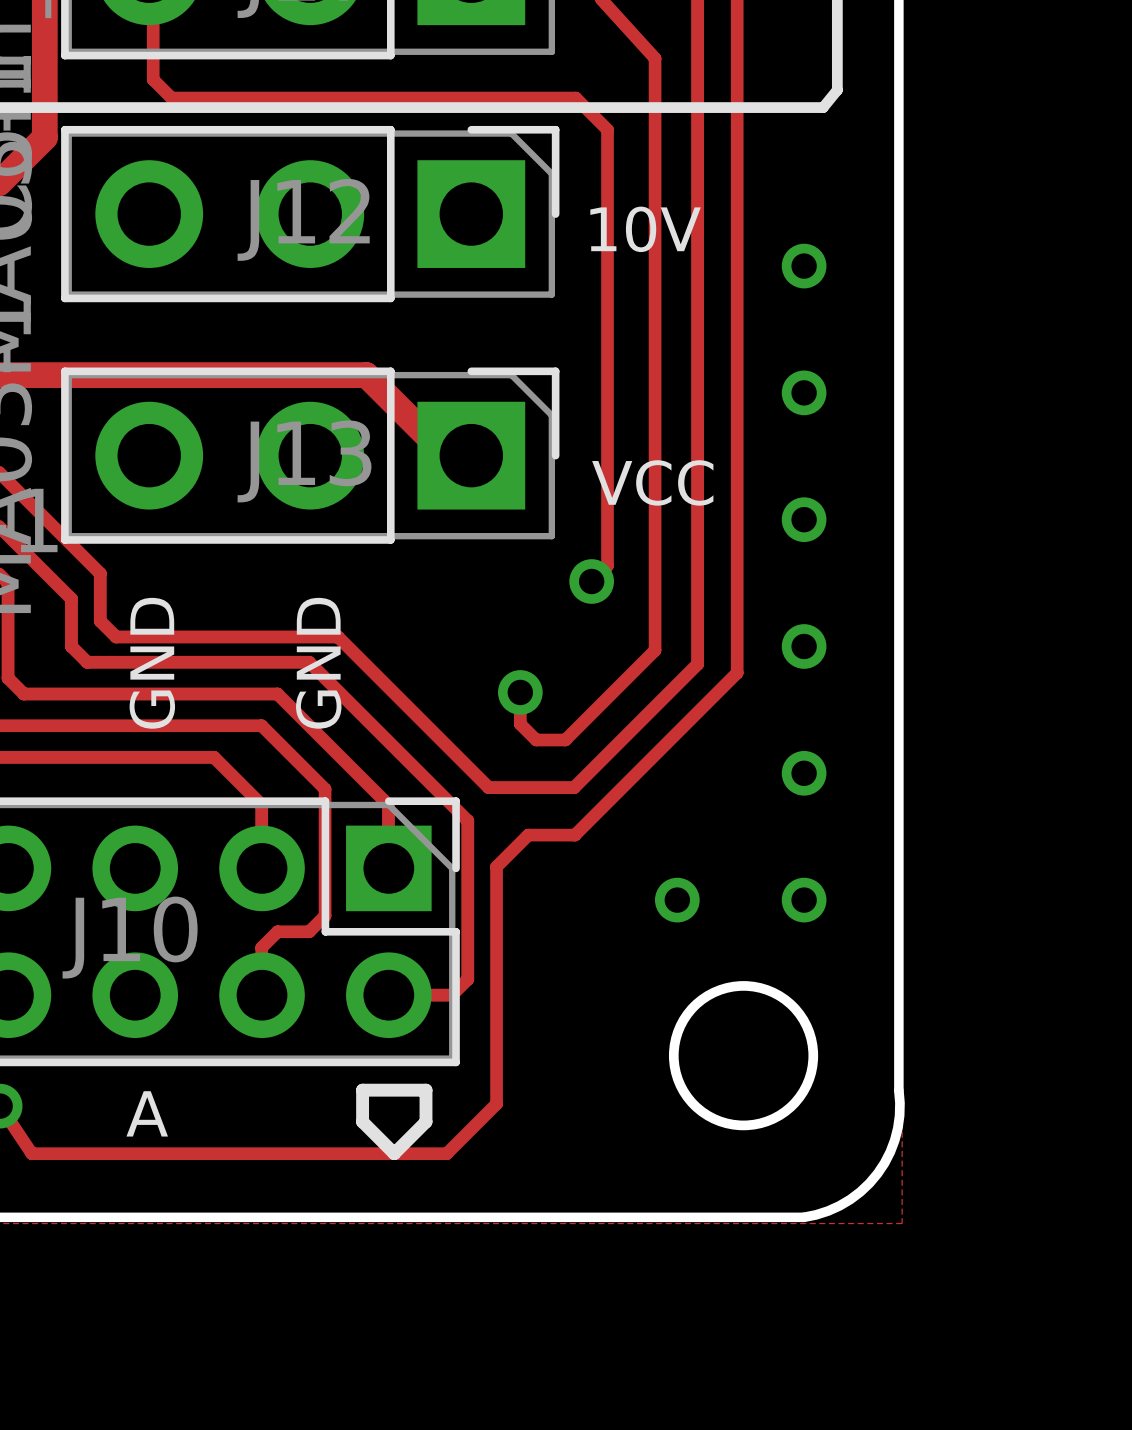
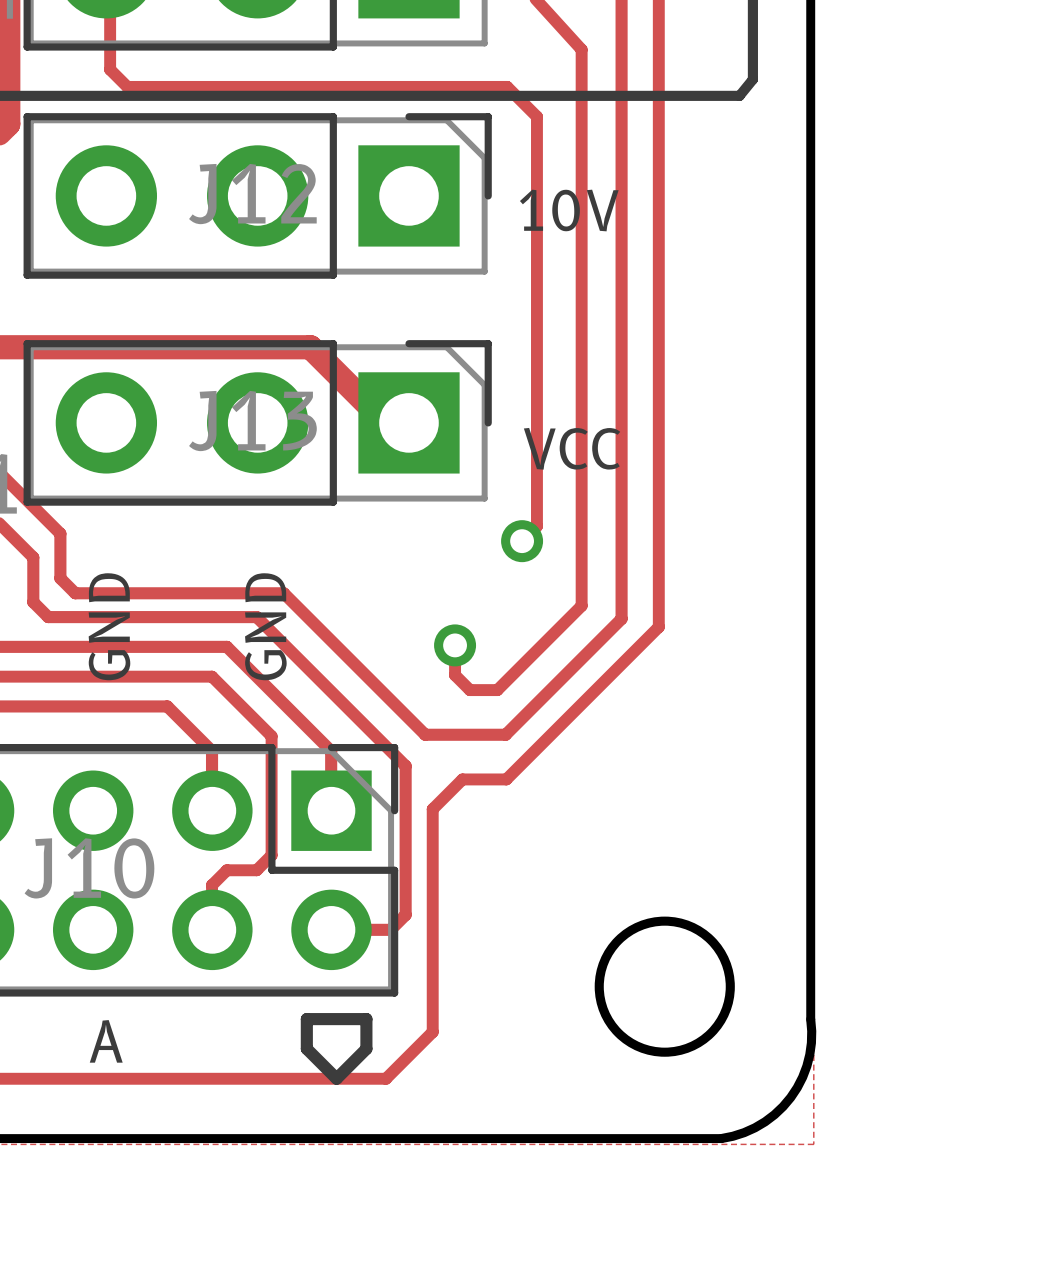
via: (804, 266) -> none
via: (804, 392) -> none
via: (804, 519) -> none
via: (804, 646) -> none
via: (804, 773) -> none
via: (677, 900) -> none
via: (804, 900) -> none

